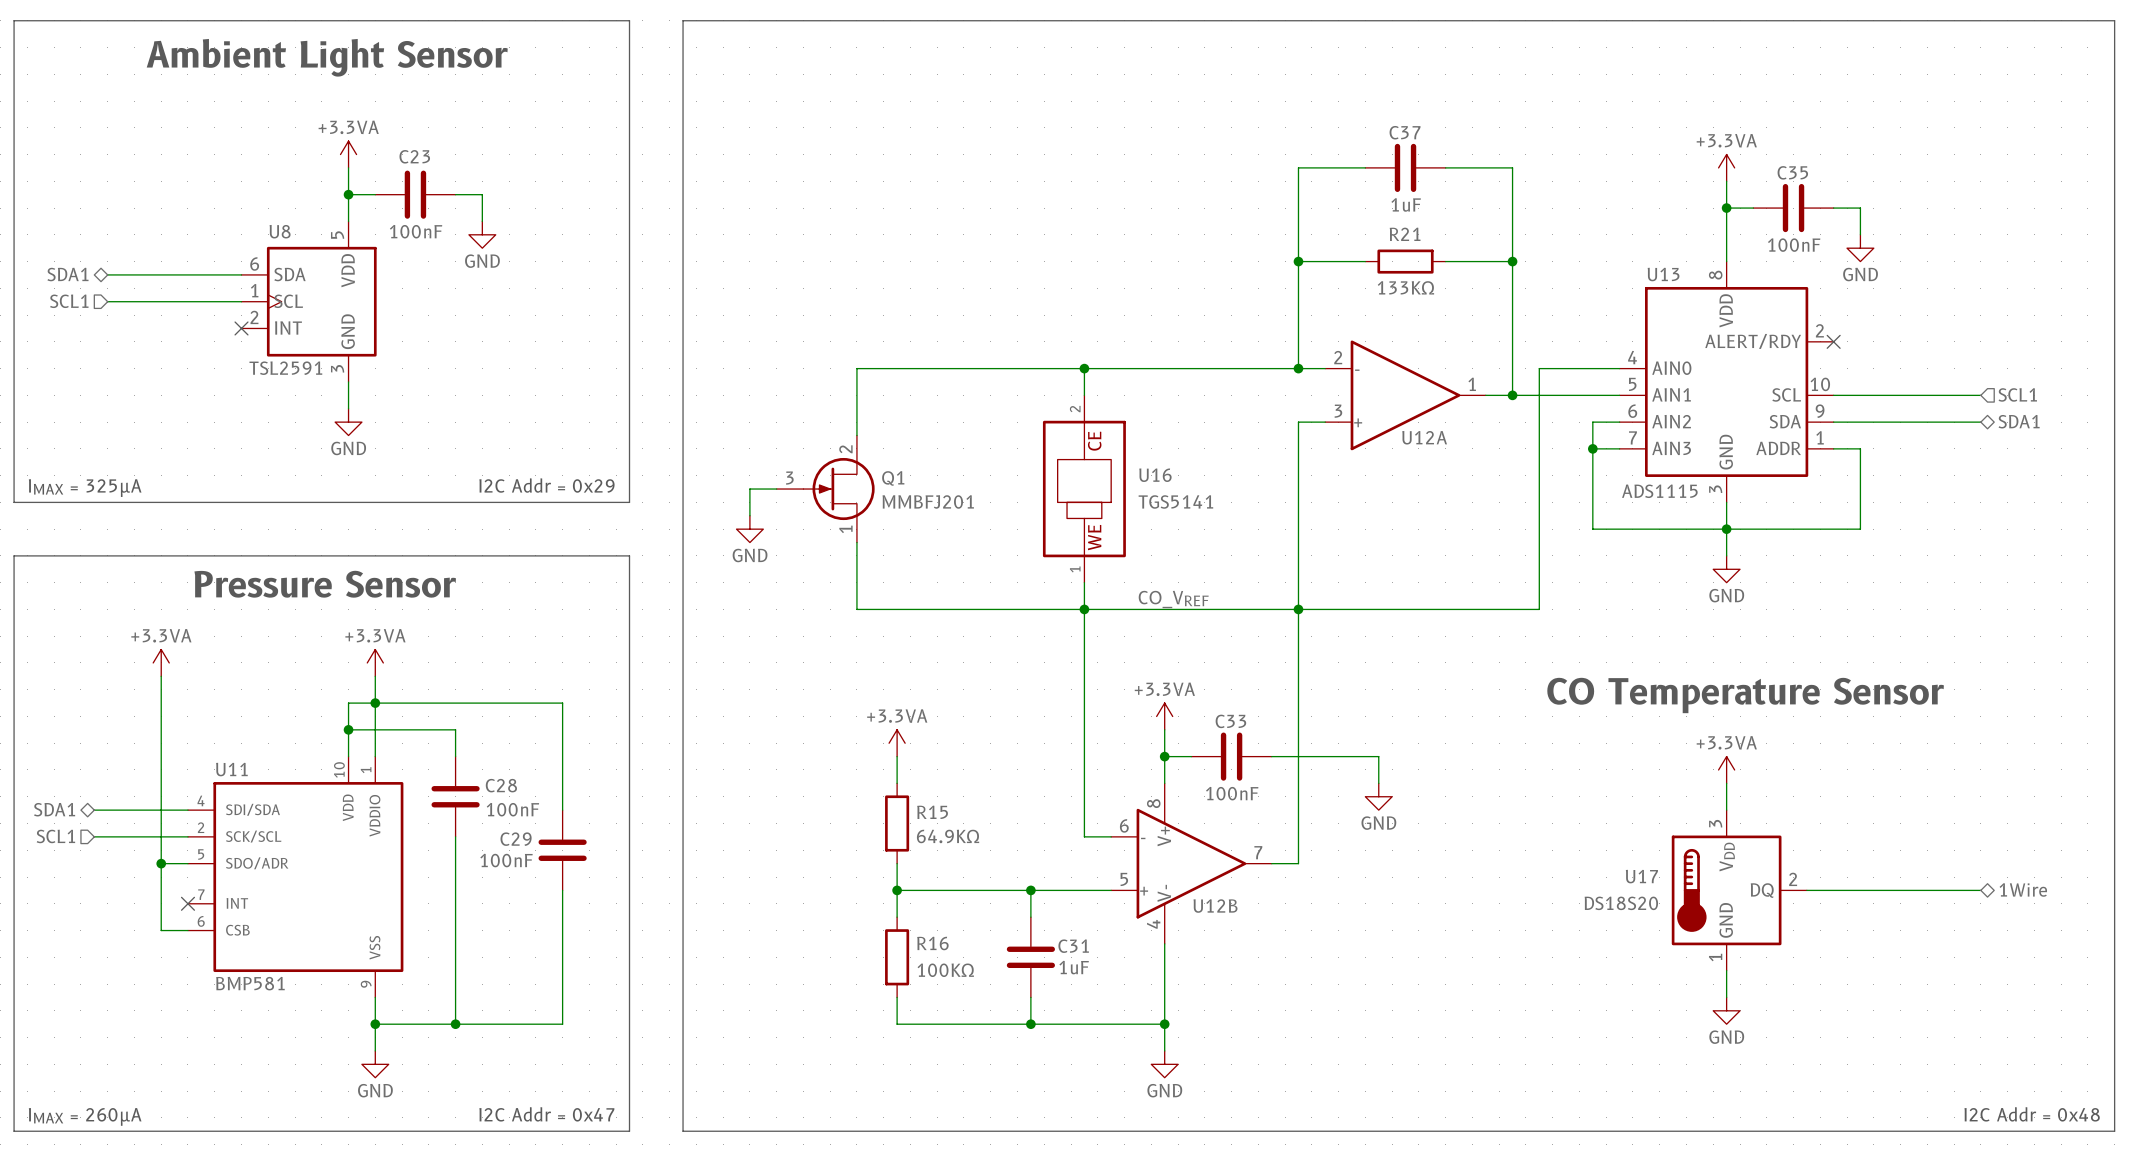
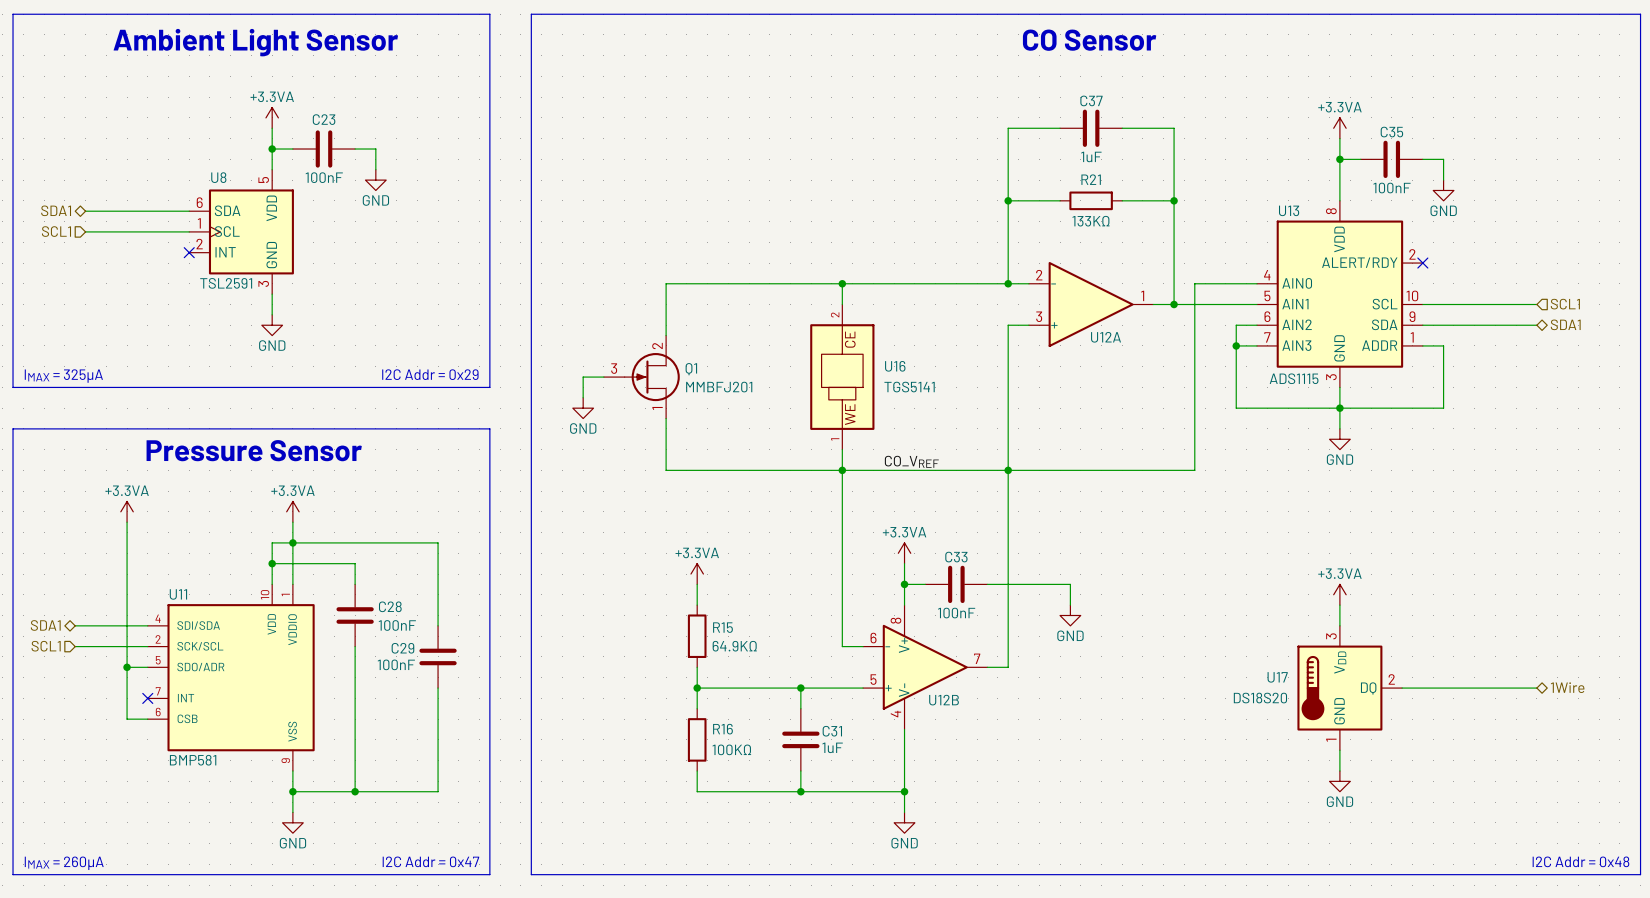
text: none -> CO Sensor (1089, 40)
text: CO Temperature Sensor (1745, 695) -> none

